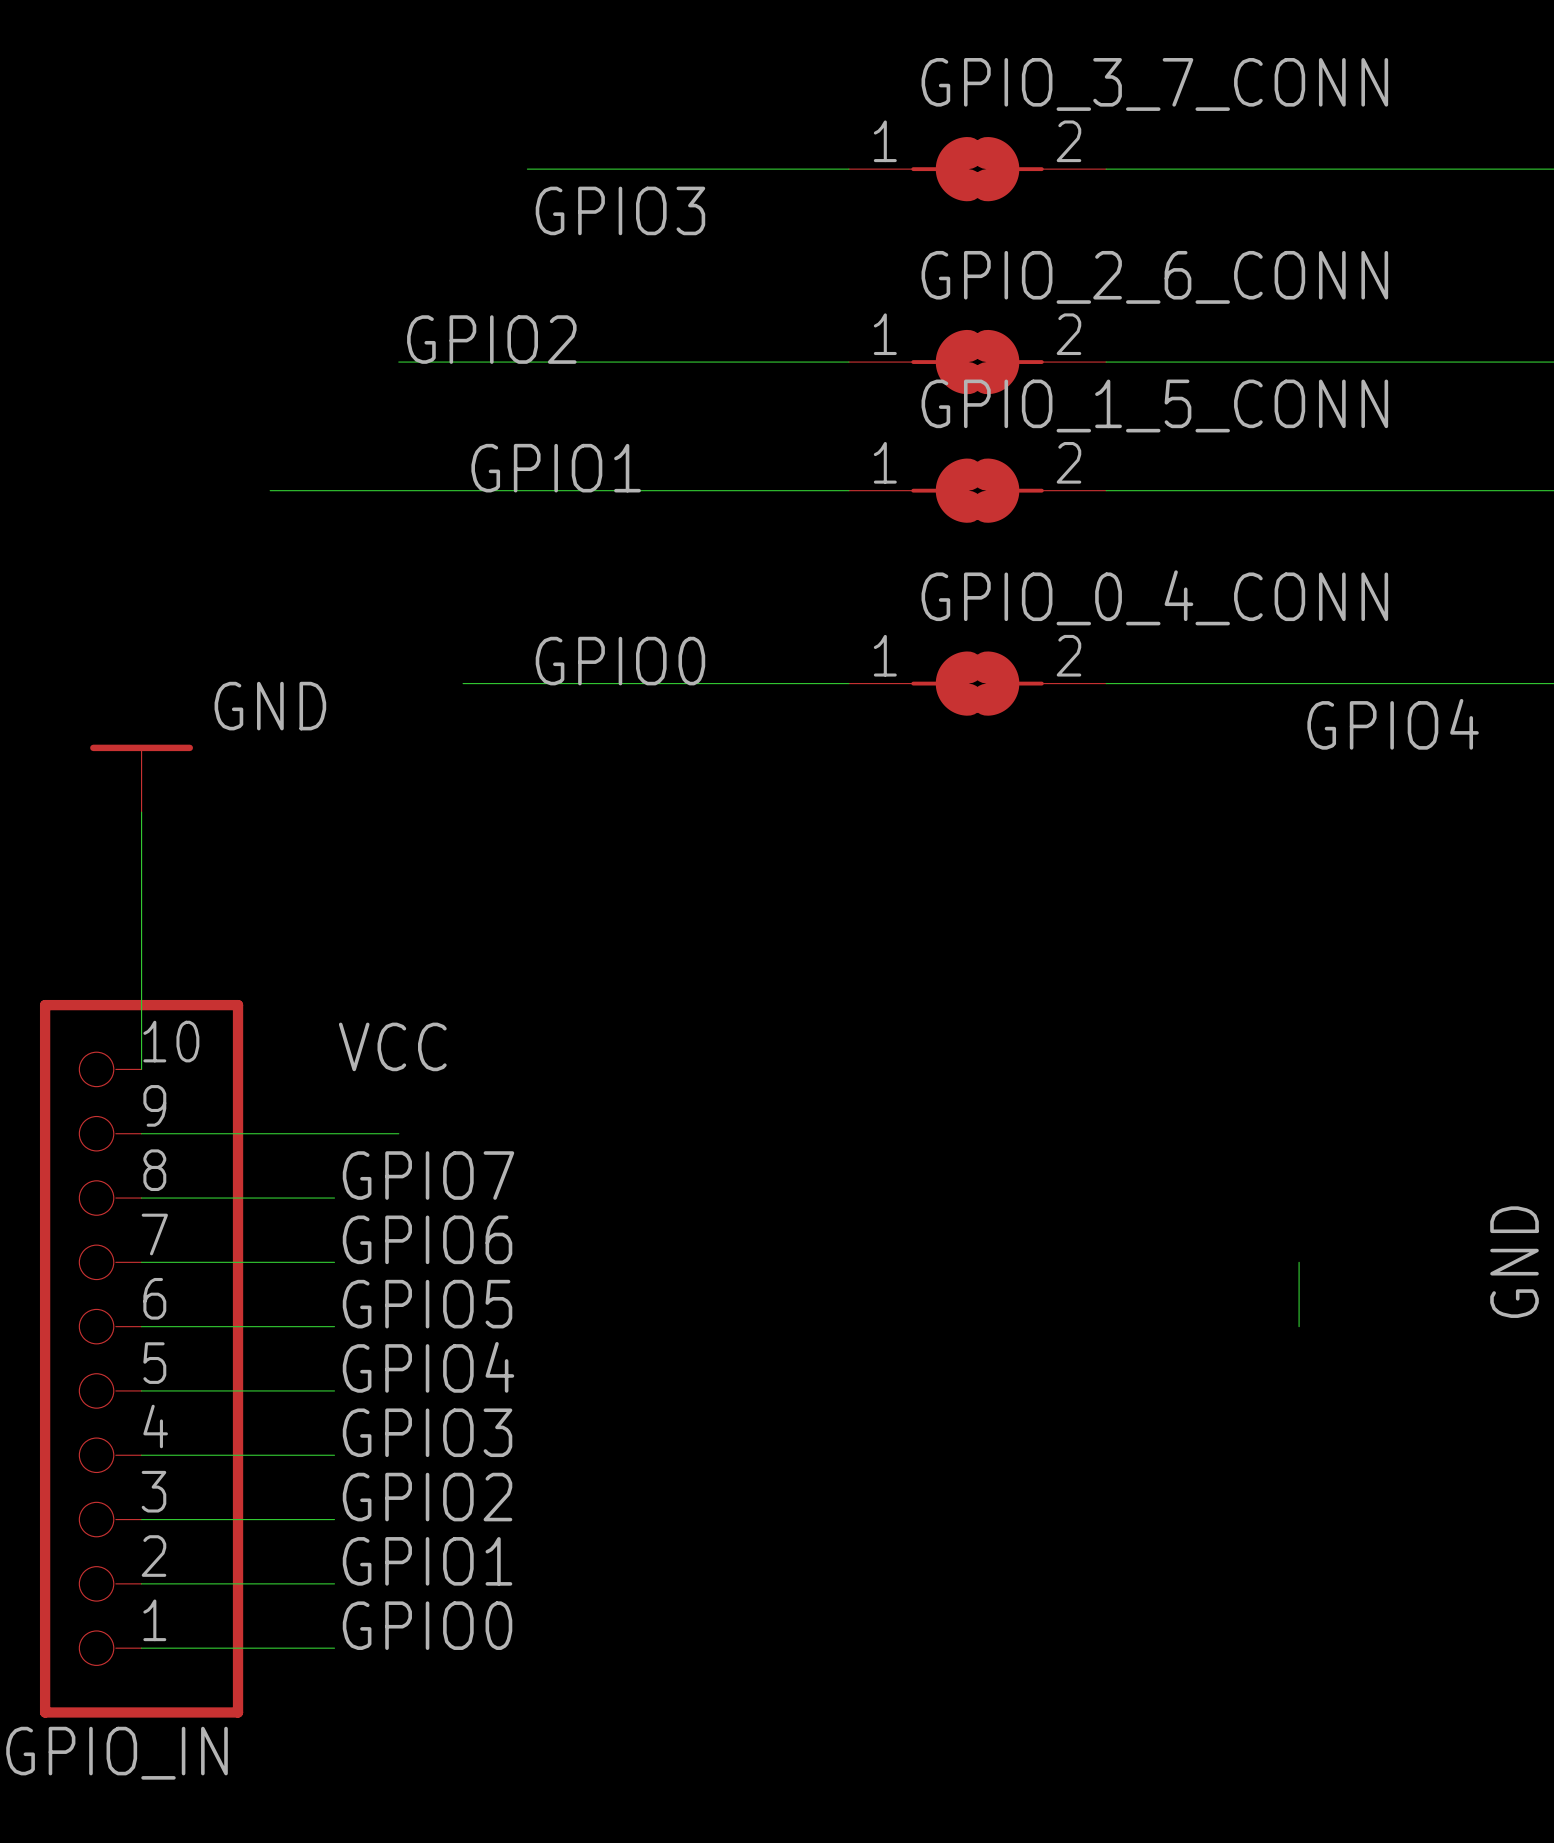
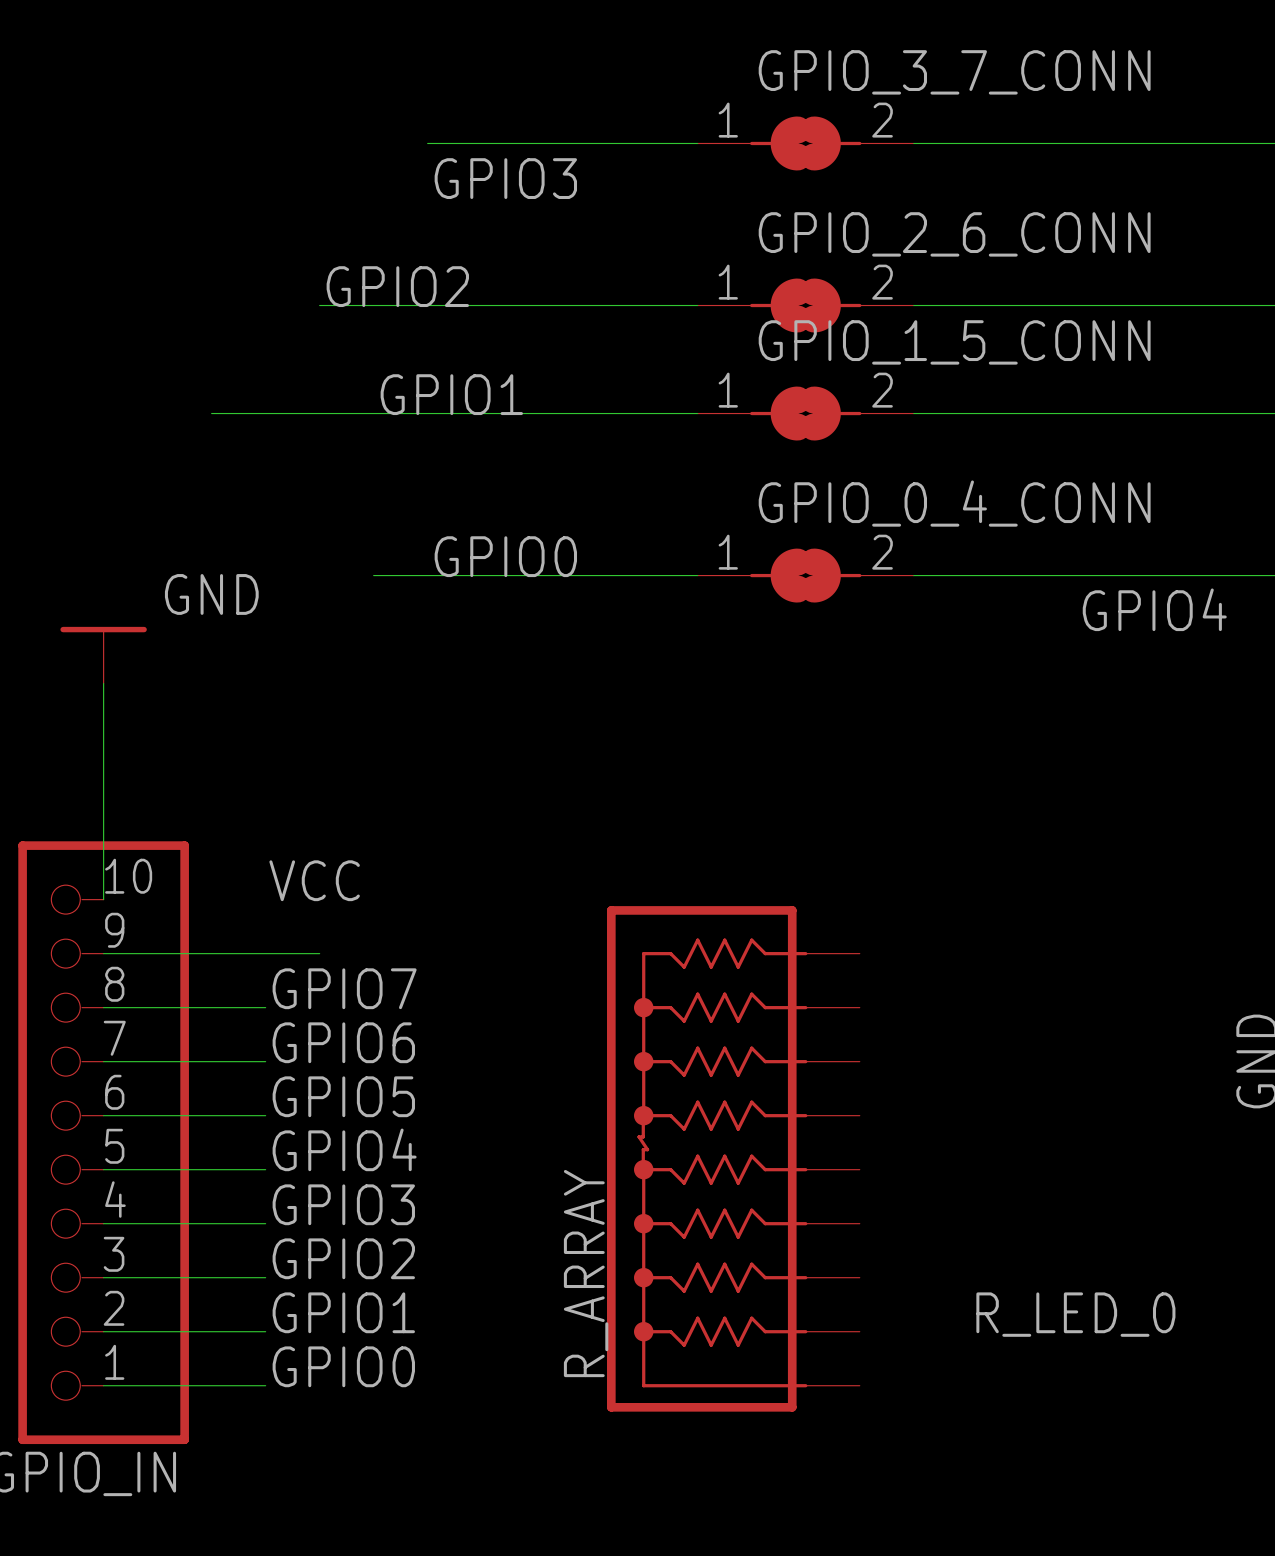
wire: (1299, 1262) (1299, 1326) -> none
R_ARRAY: none -> (733, 1158)
label: none -> R_LED_0 (1075, 1314)

